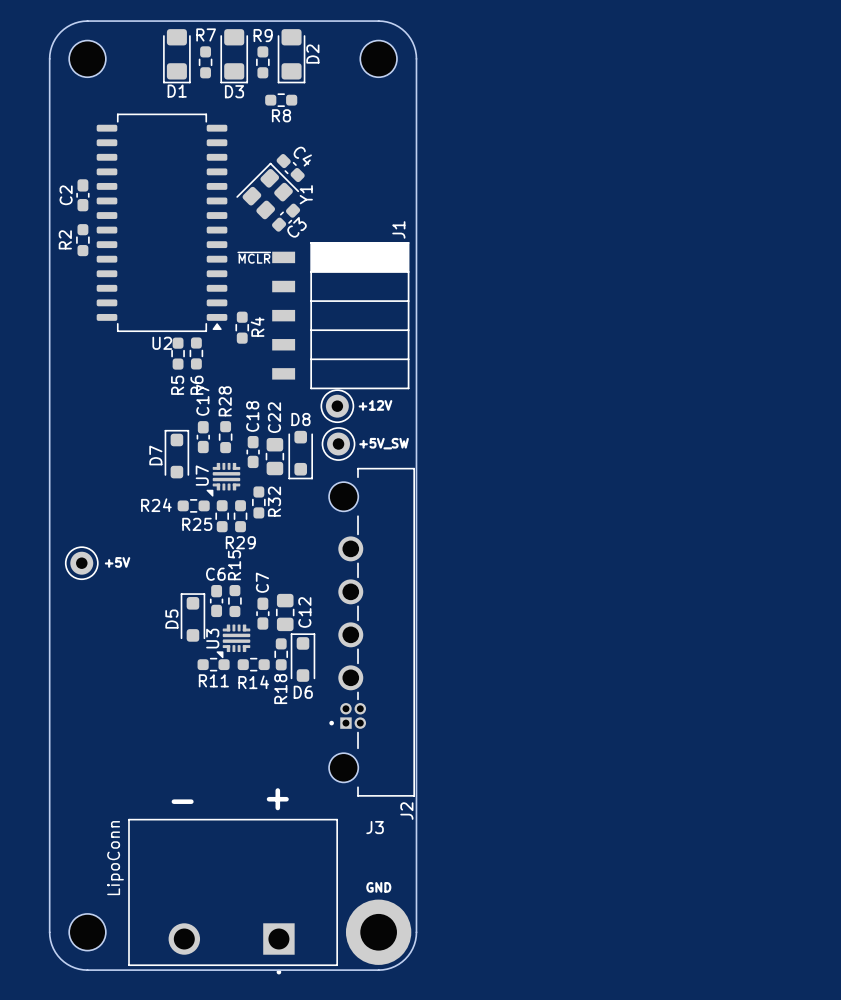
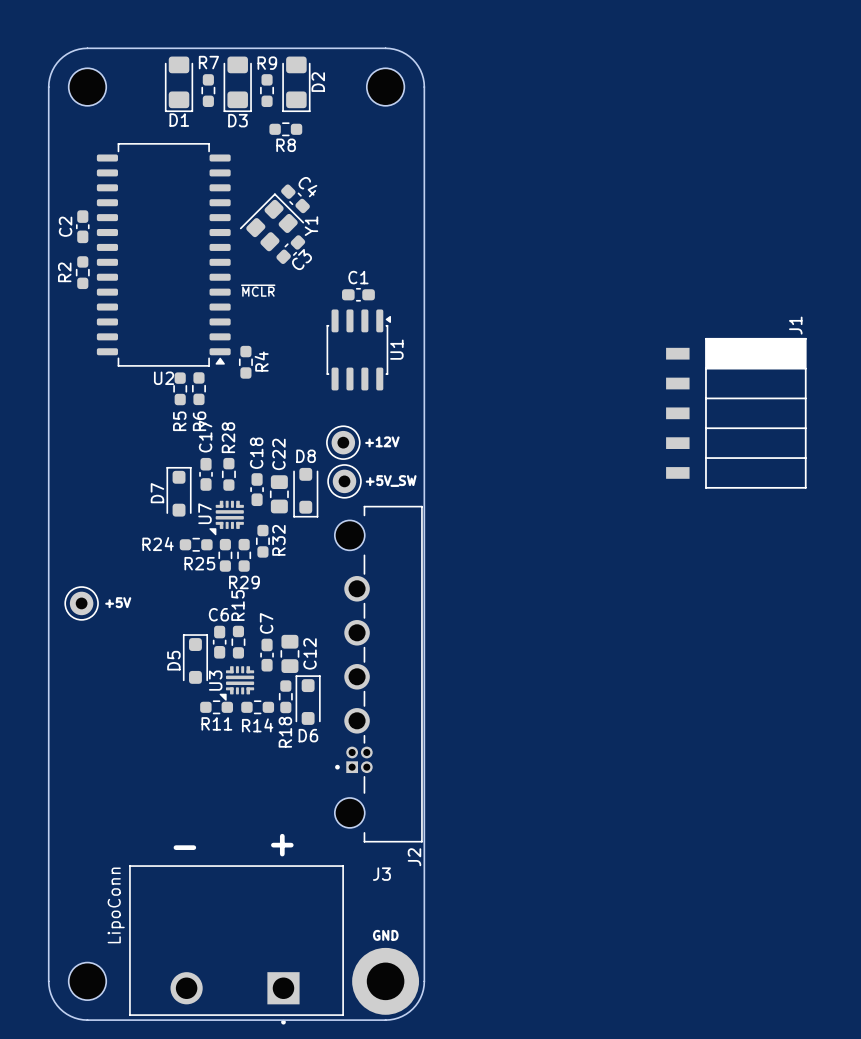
C1: none -> (358, 294)
J1 position: (340, 315) -> (736, 413)
U1: none -> (358, 349)

